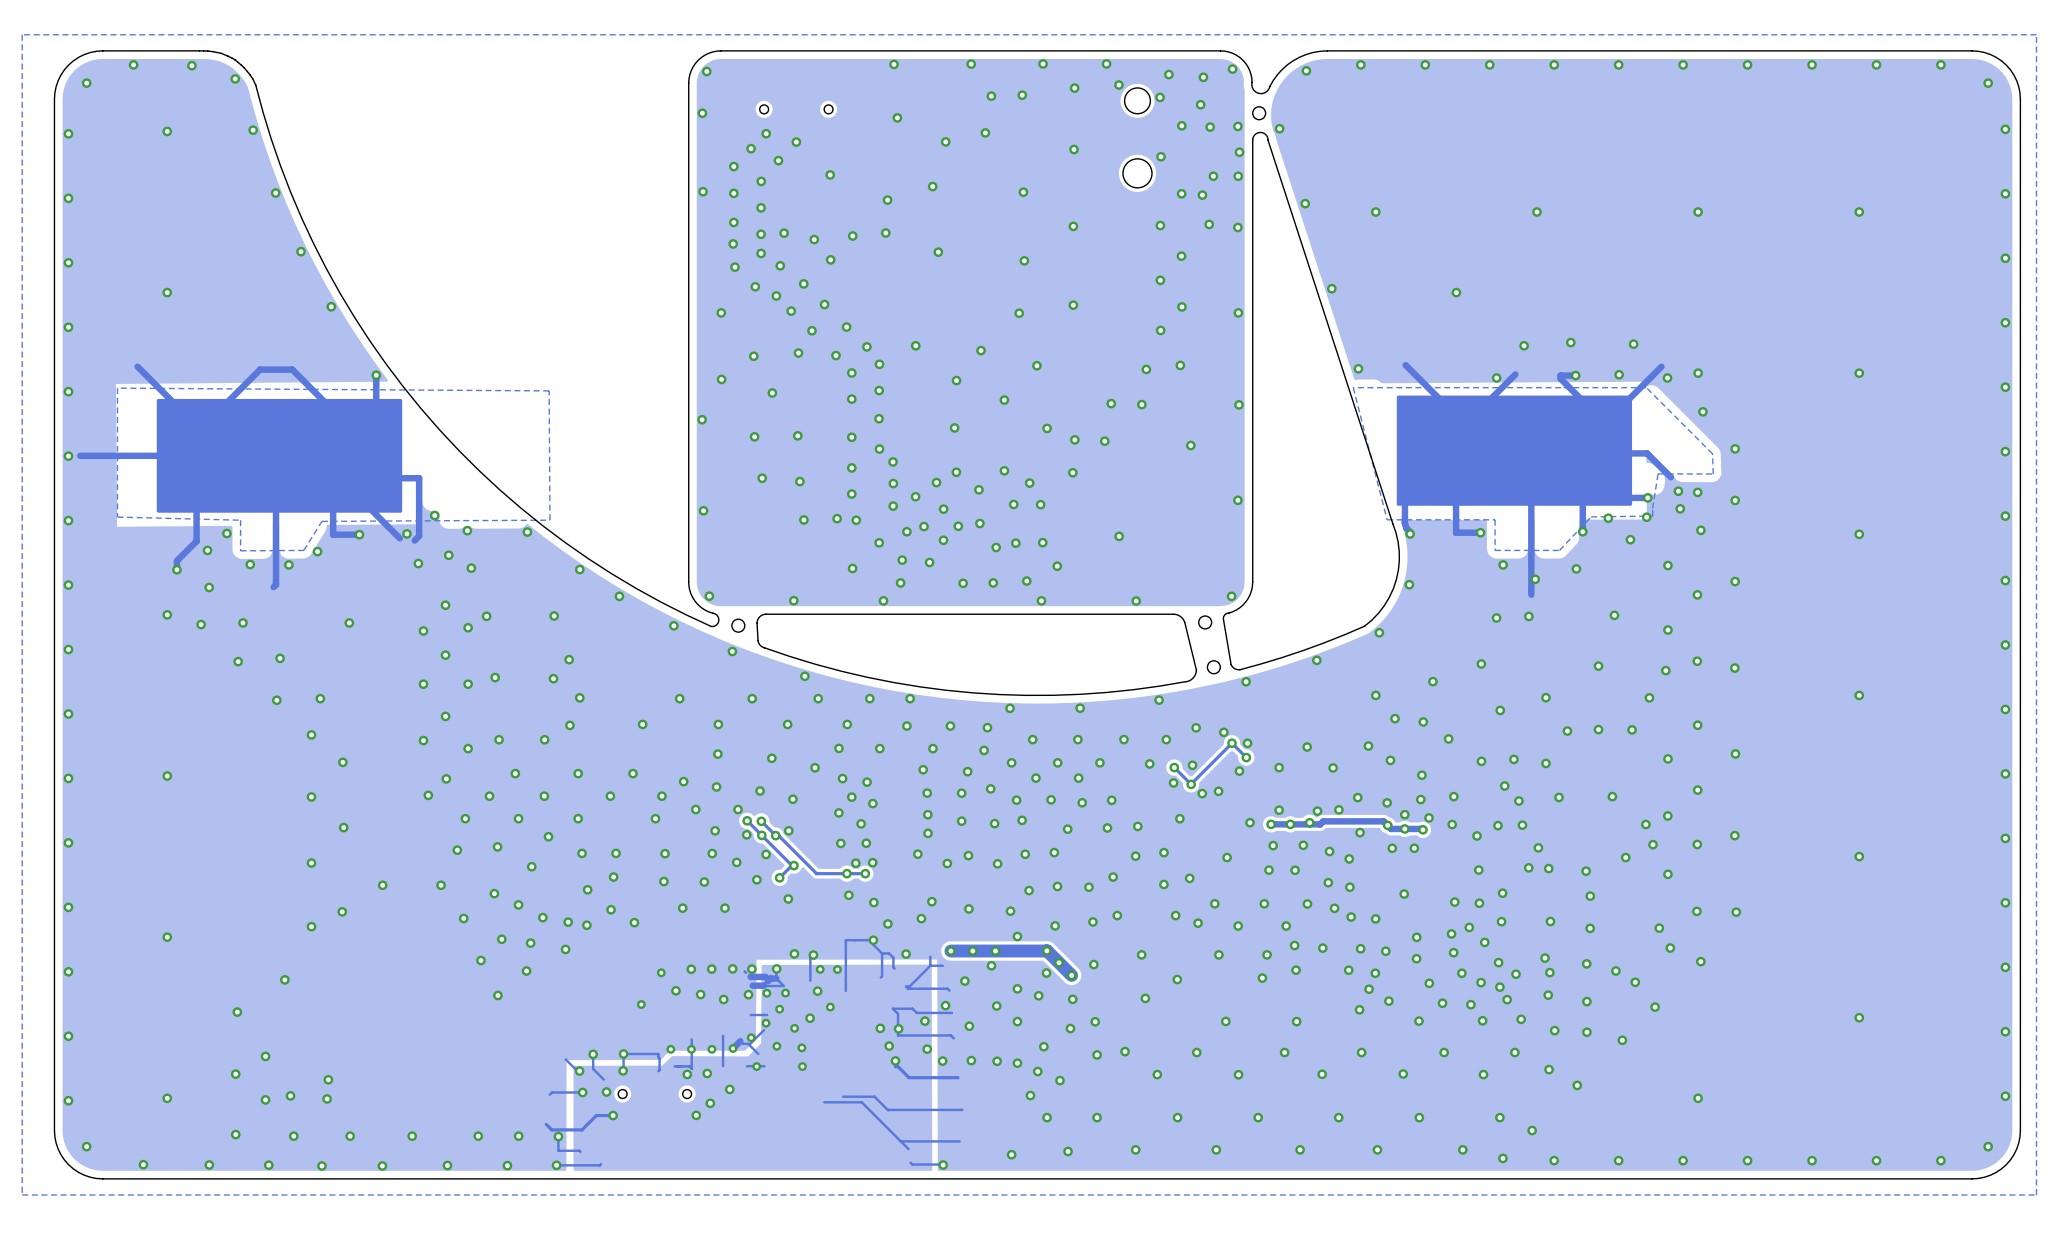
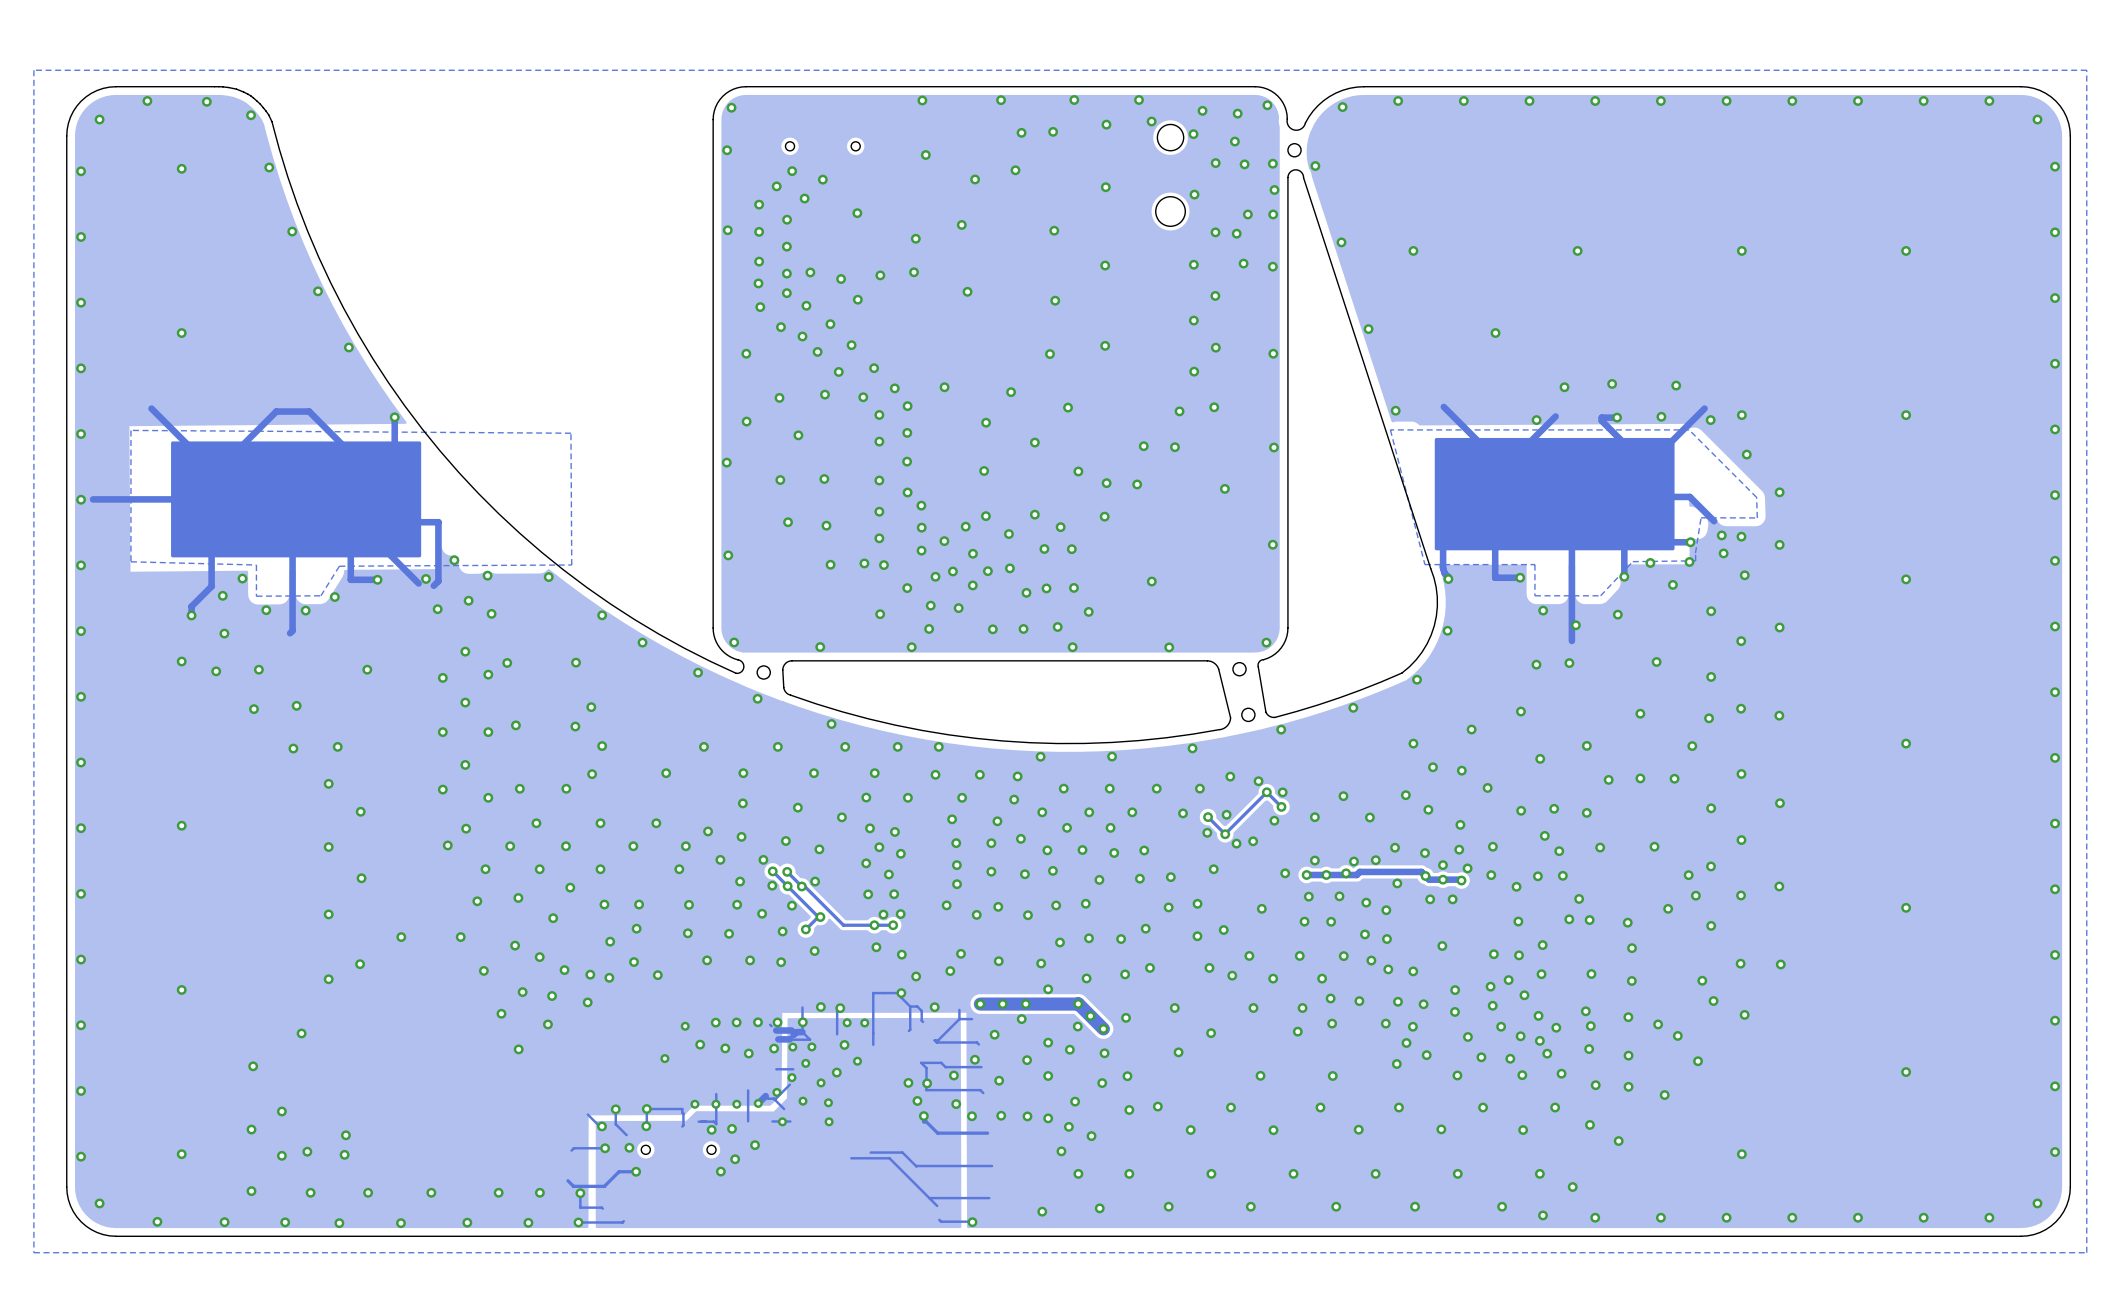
via: none -> (781, 962)
track: none -> (802, 1007) (802, 1022)

